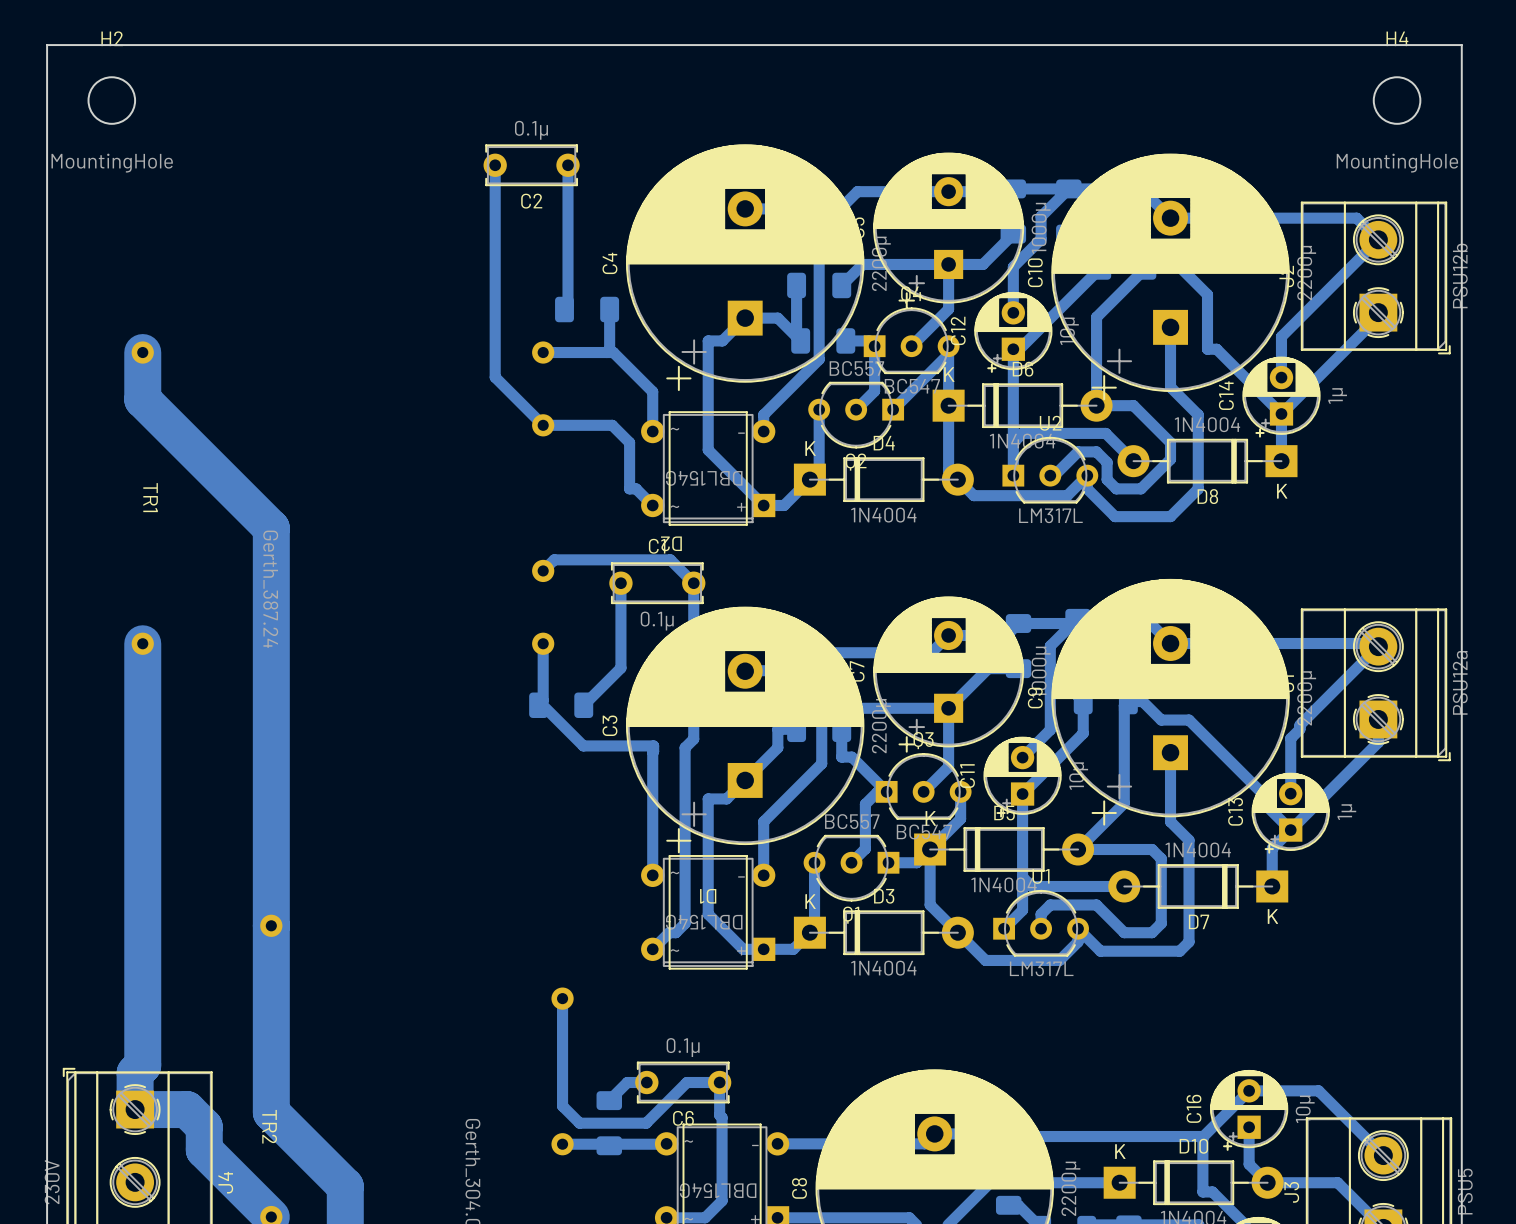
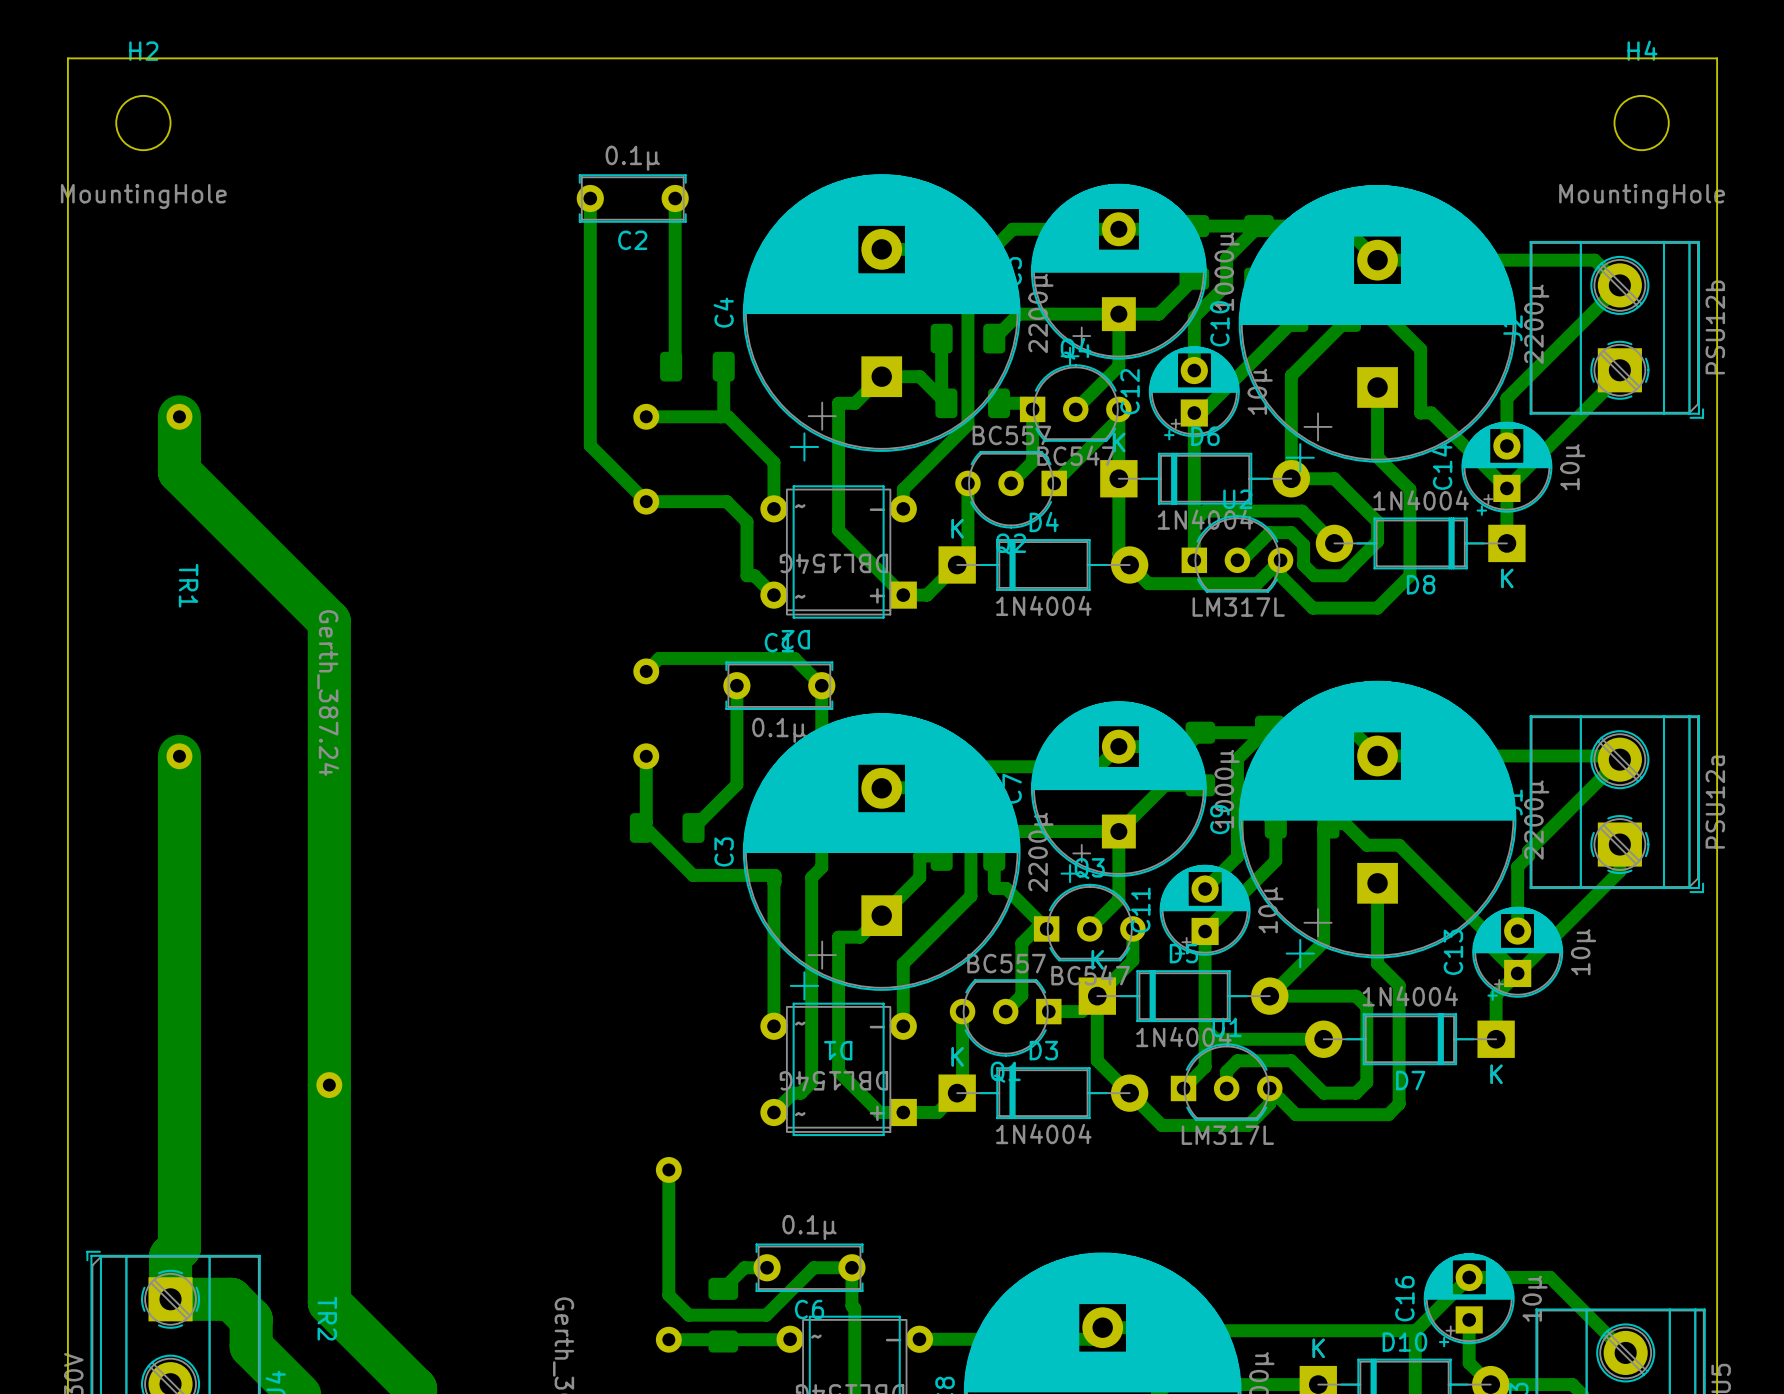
C14 value: 1µ (1337, 396) -> 10µ (1572, 467)
C13 value: 1µ (1346, 812) -> 10µ (1583, 952)

